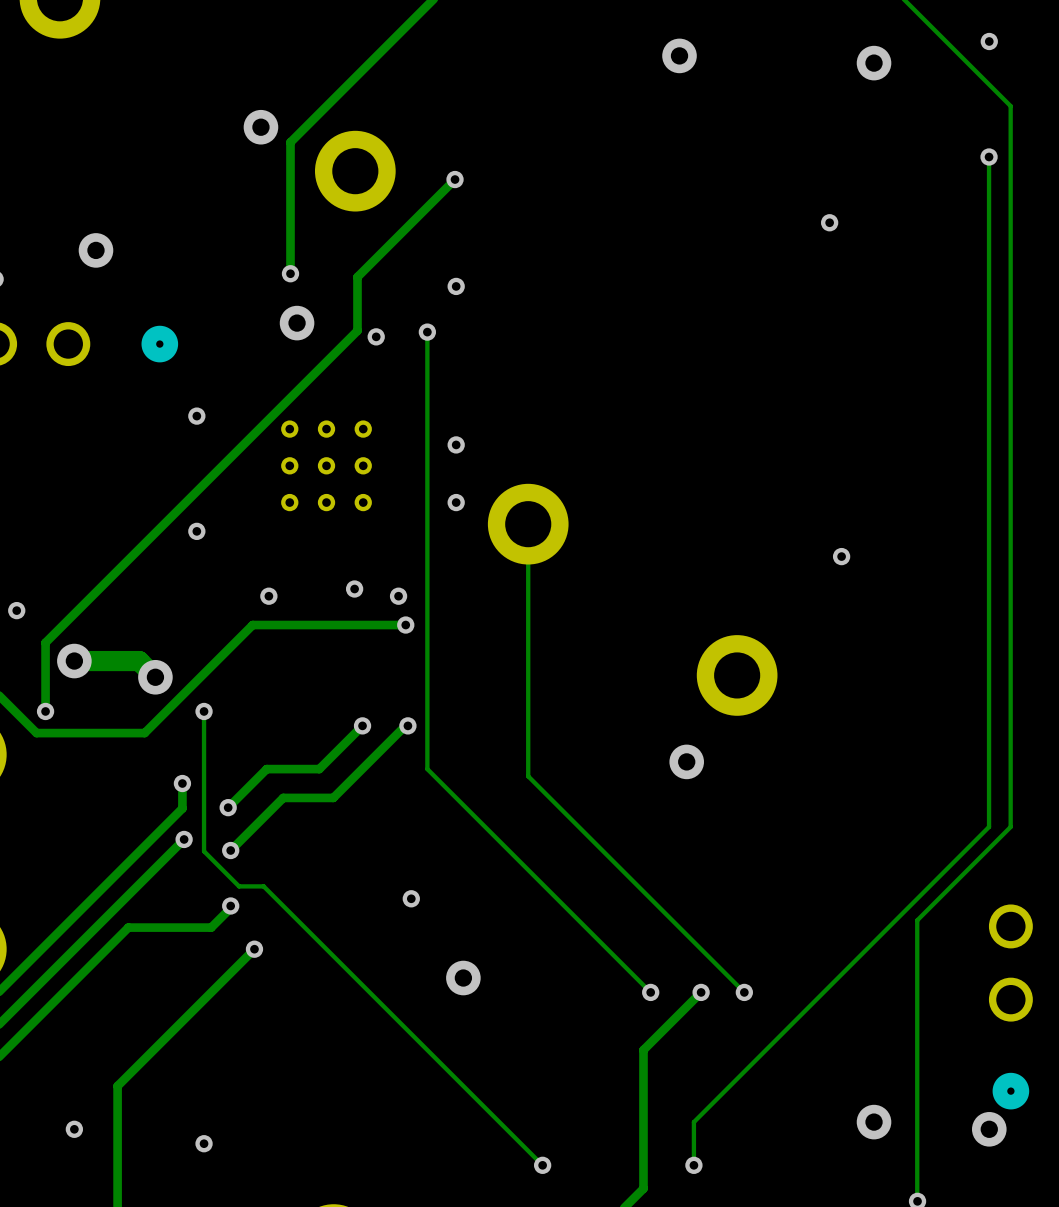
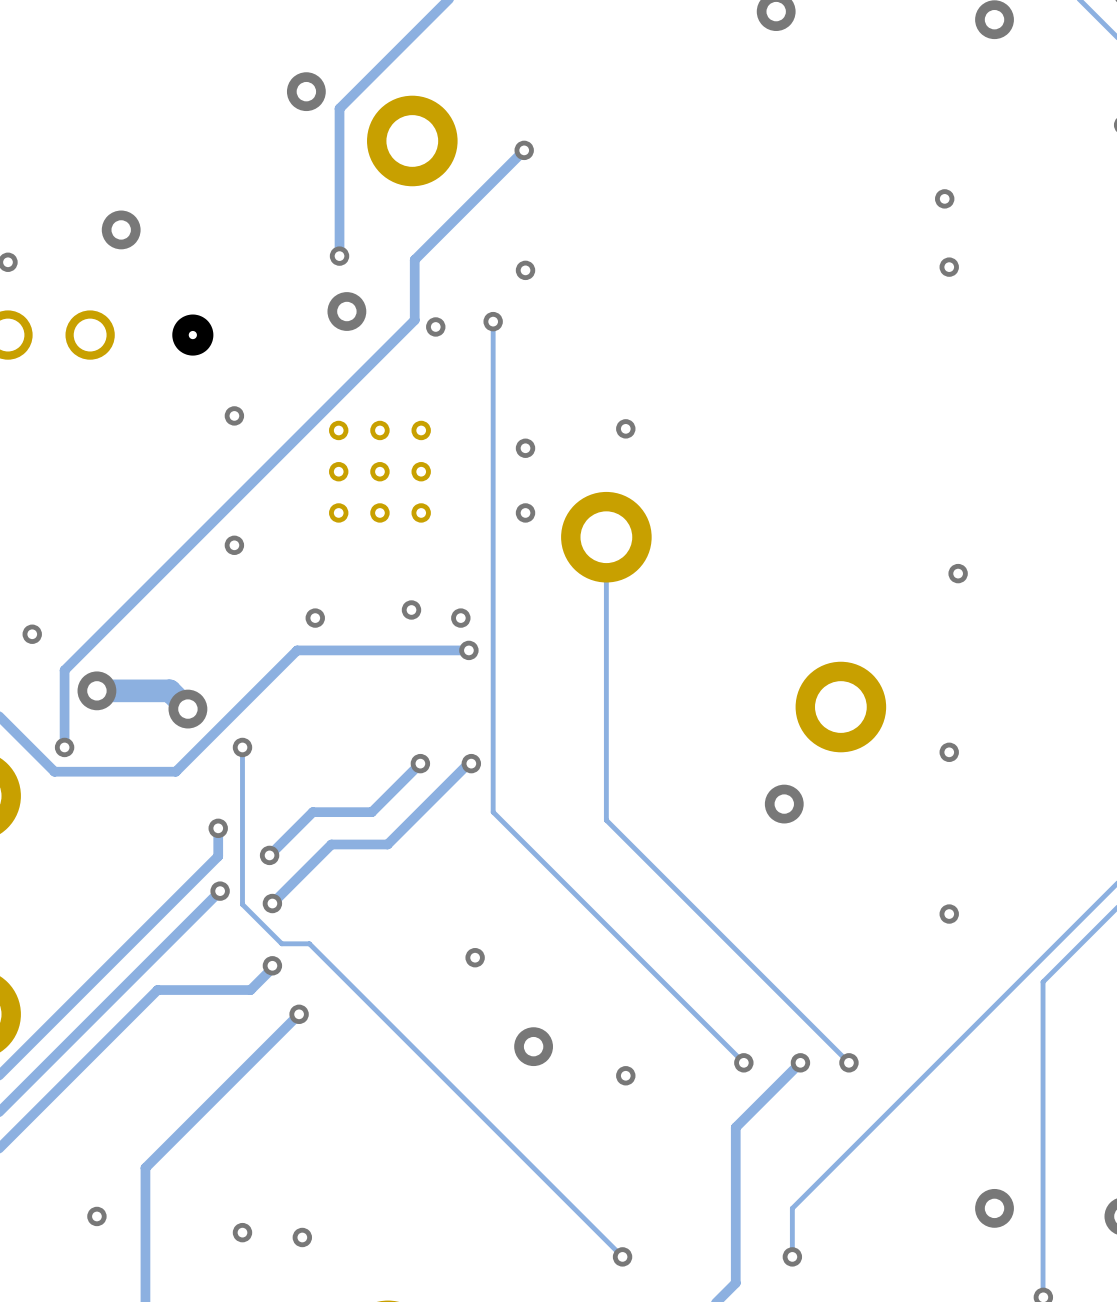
via: none -> (949, 267)
via: none -> (625, 428)
via: none -> (949, 752)
via: none -> (949, 914)
via: none -> (625, 1075)
via: none -> (302, 1237)

